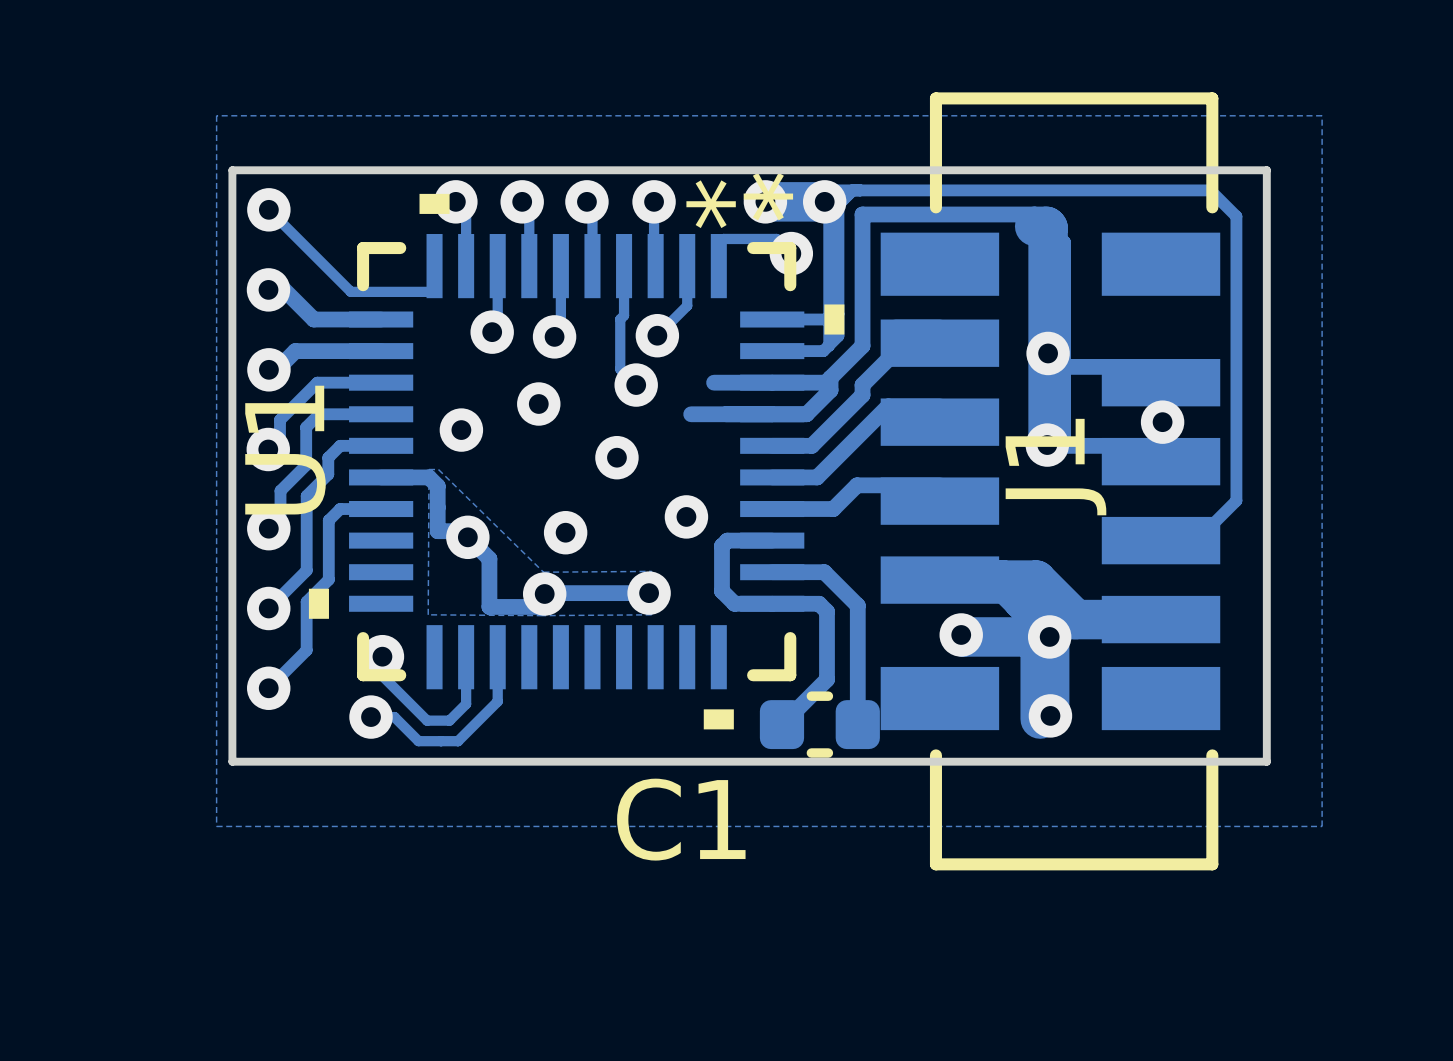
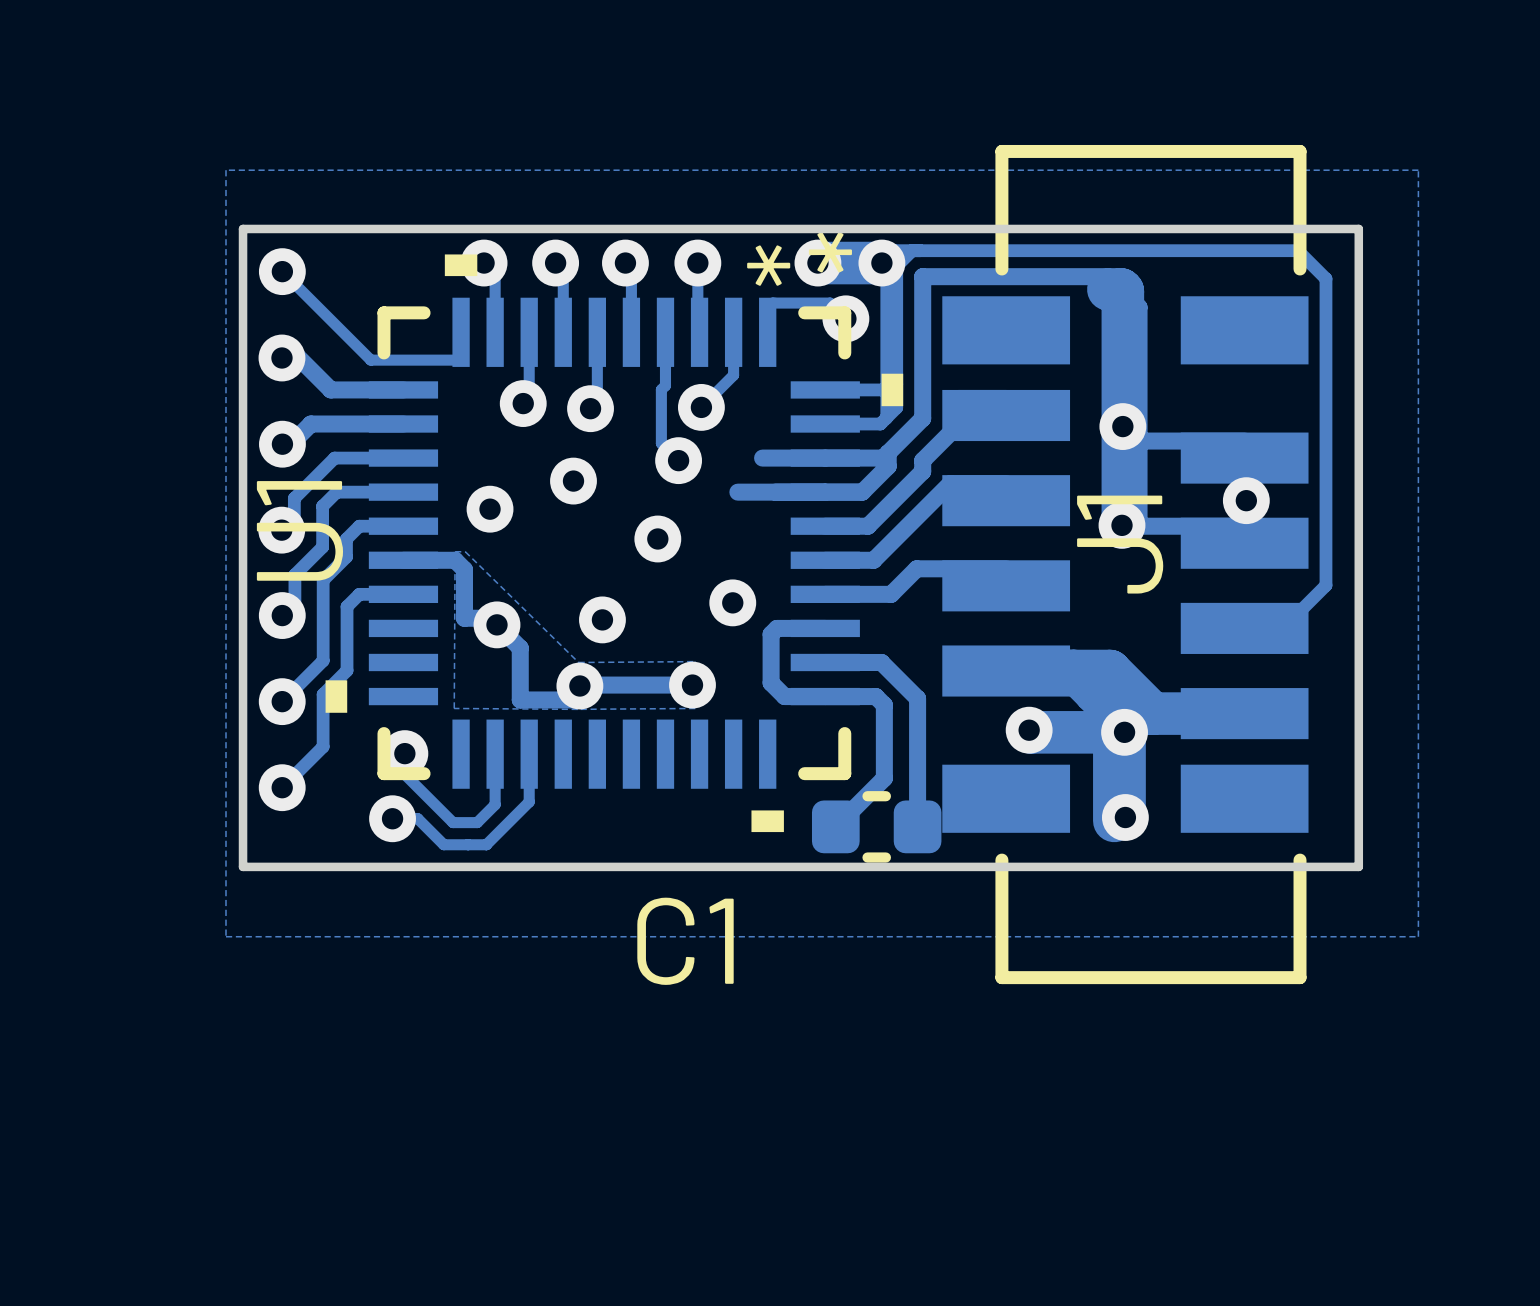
C1 name position: C1 (681, 819) -> C1 (685, 941)

